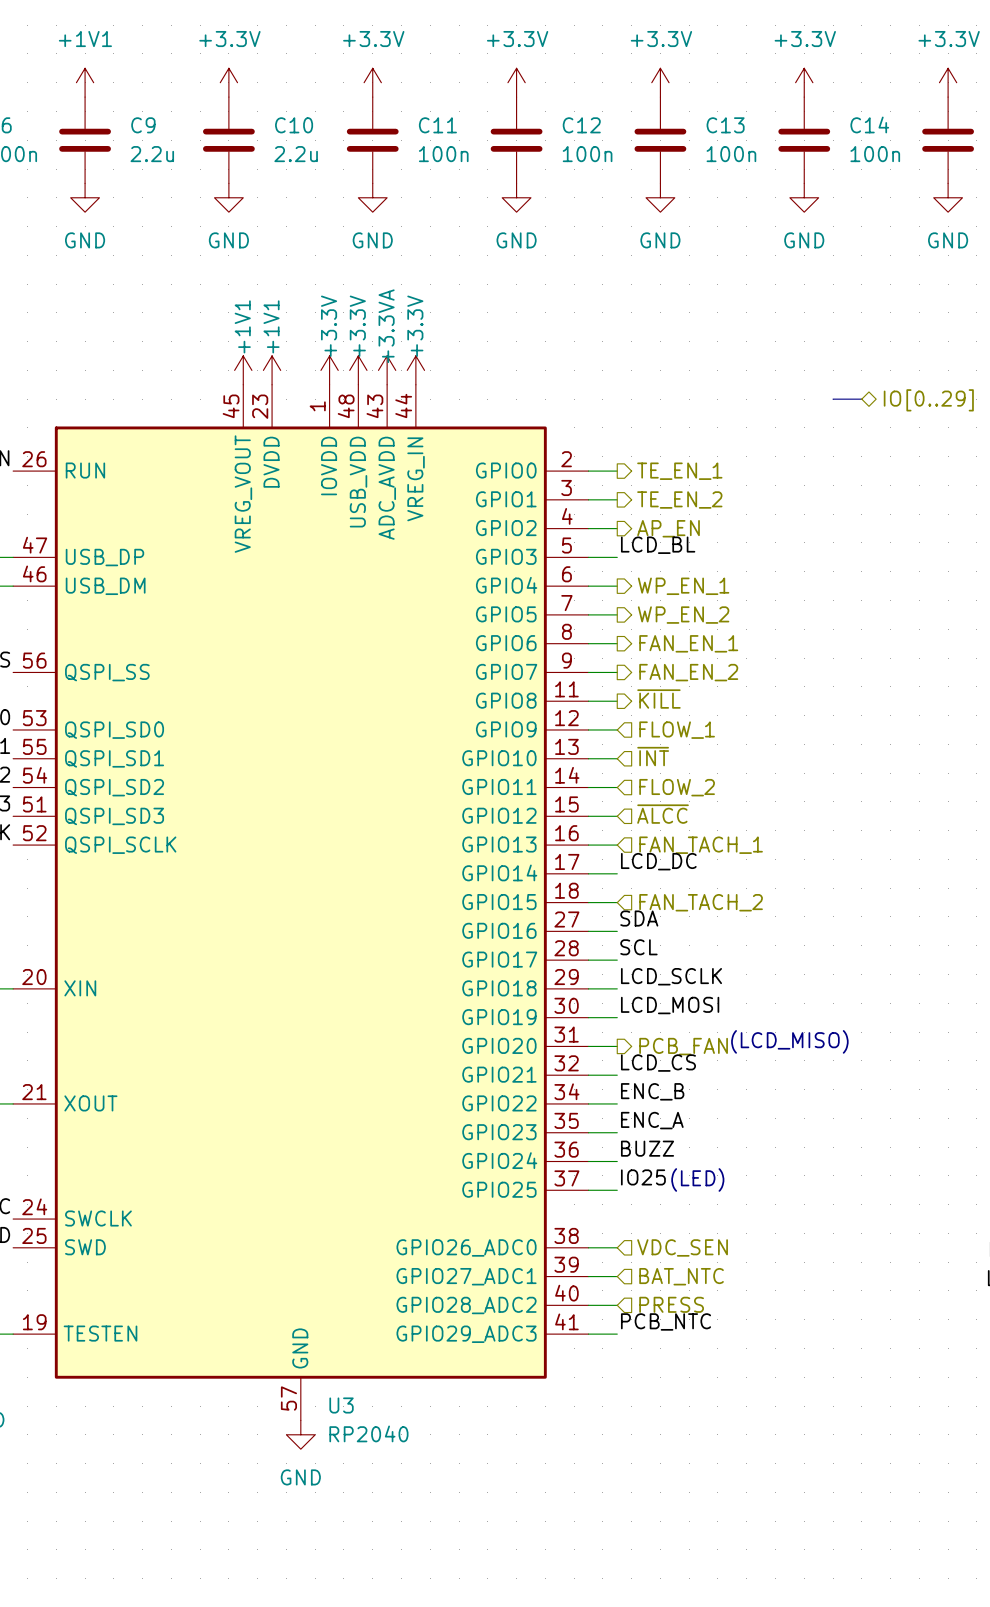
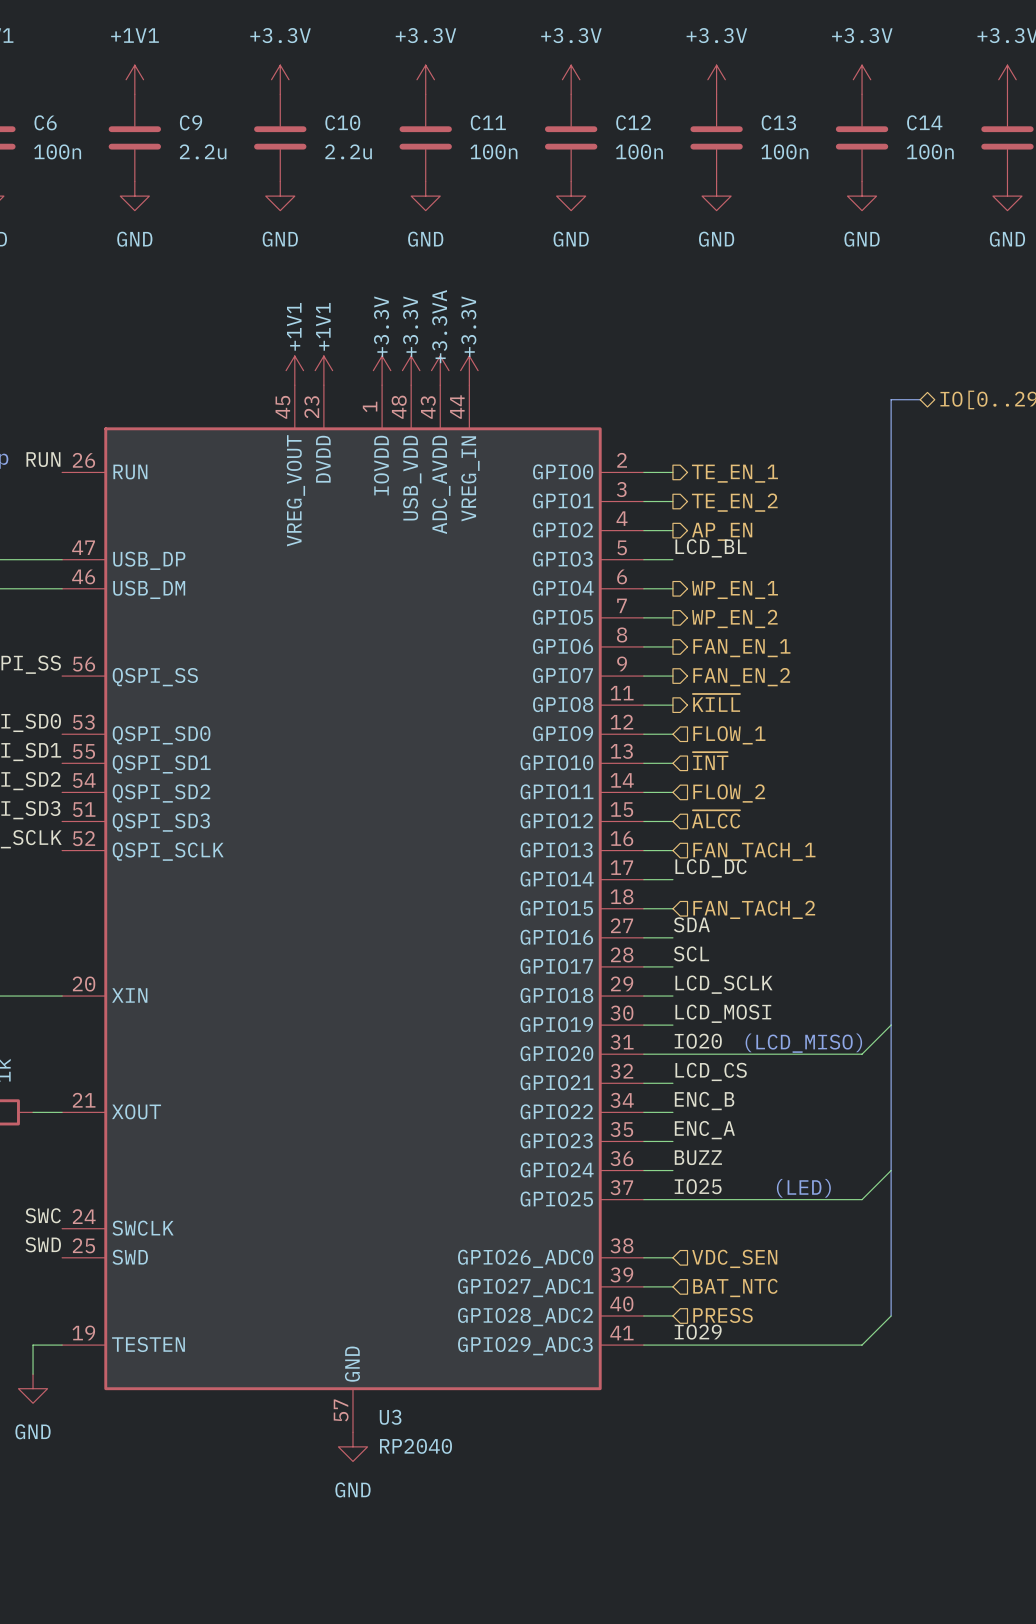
bus: none -> (891, 399) (891, 1315)
wire: none -> (891, 1025) (862, 1054) (672, 1054)
label: none -> IO20 (698, 1041)
text position: (LCD_MISO) (789, 1041) -> (LCD_MISO) (803, 1043)
hierarchical label: PCB_FAN (683, 1046) -> none
wire: none -> (891, 1170) (862, 1199) (672, 1199)
text position: (LED) (697, 1179) -> (LED) (803, 1188)
wire: none -> (891, 1315) (862, 1345) (672, 1345)
label: PCB_NTC (666, 1321) -> IO29 (698, 1332)

